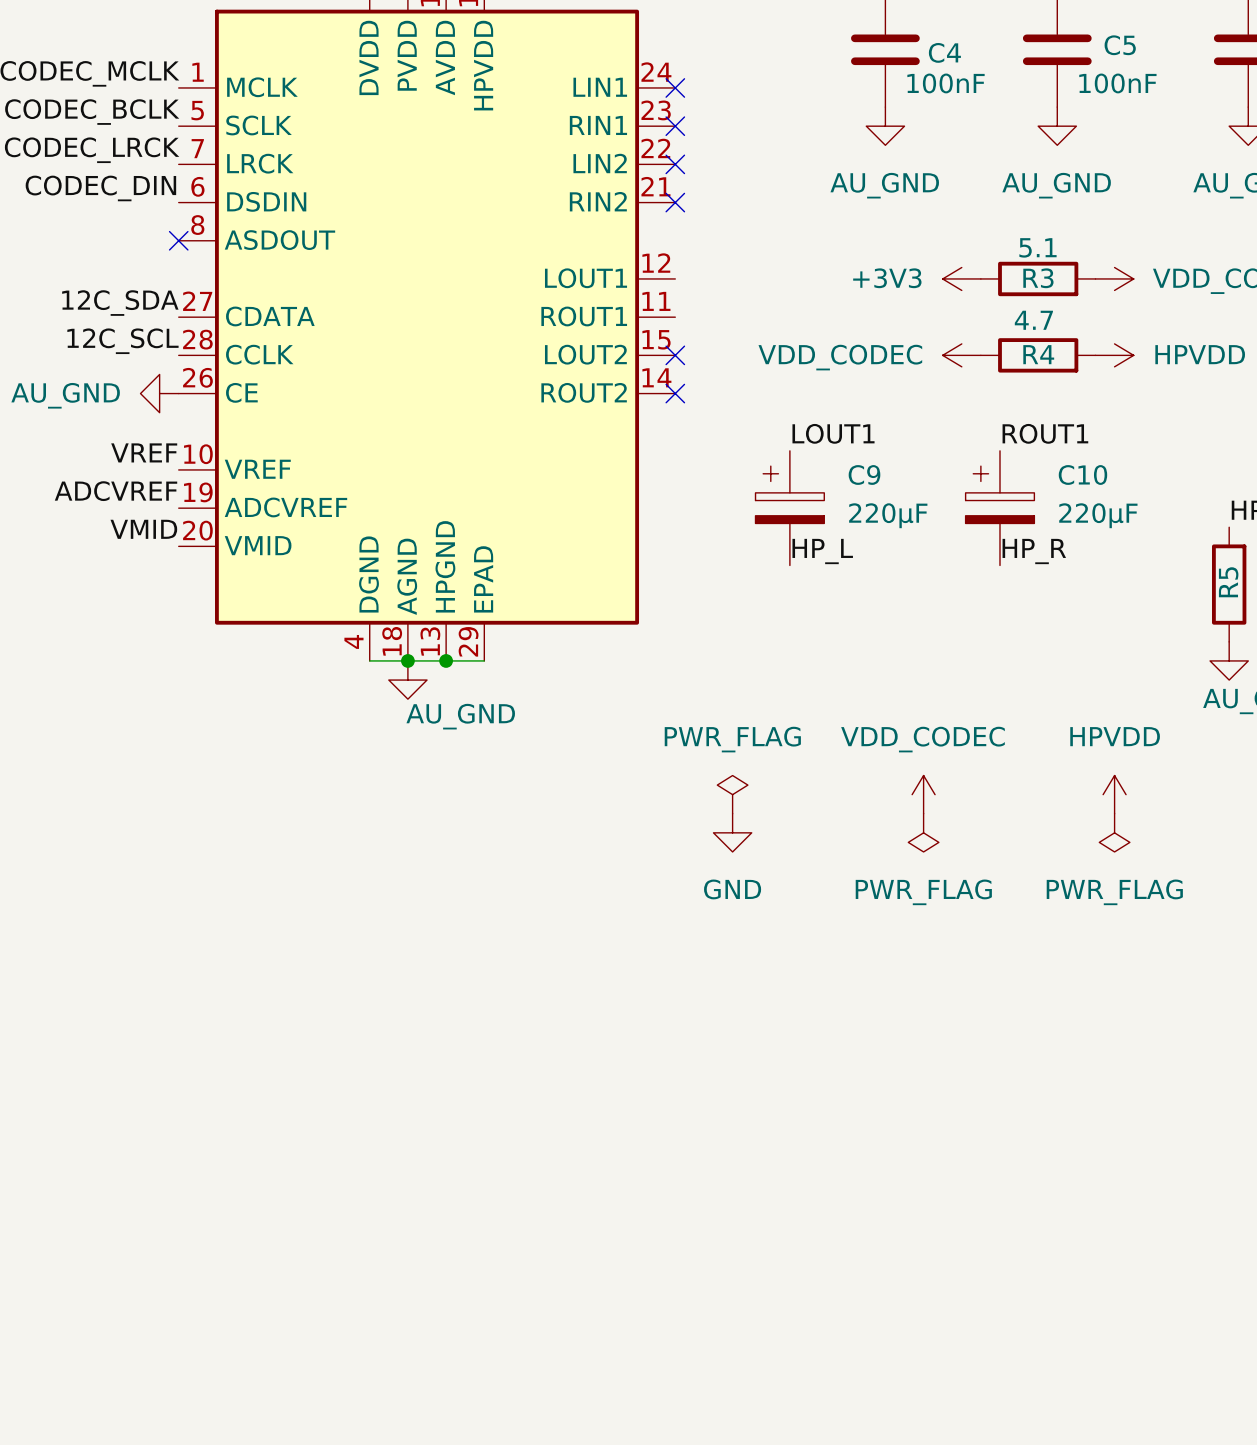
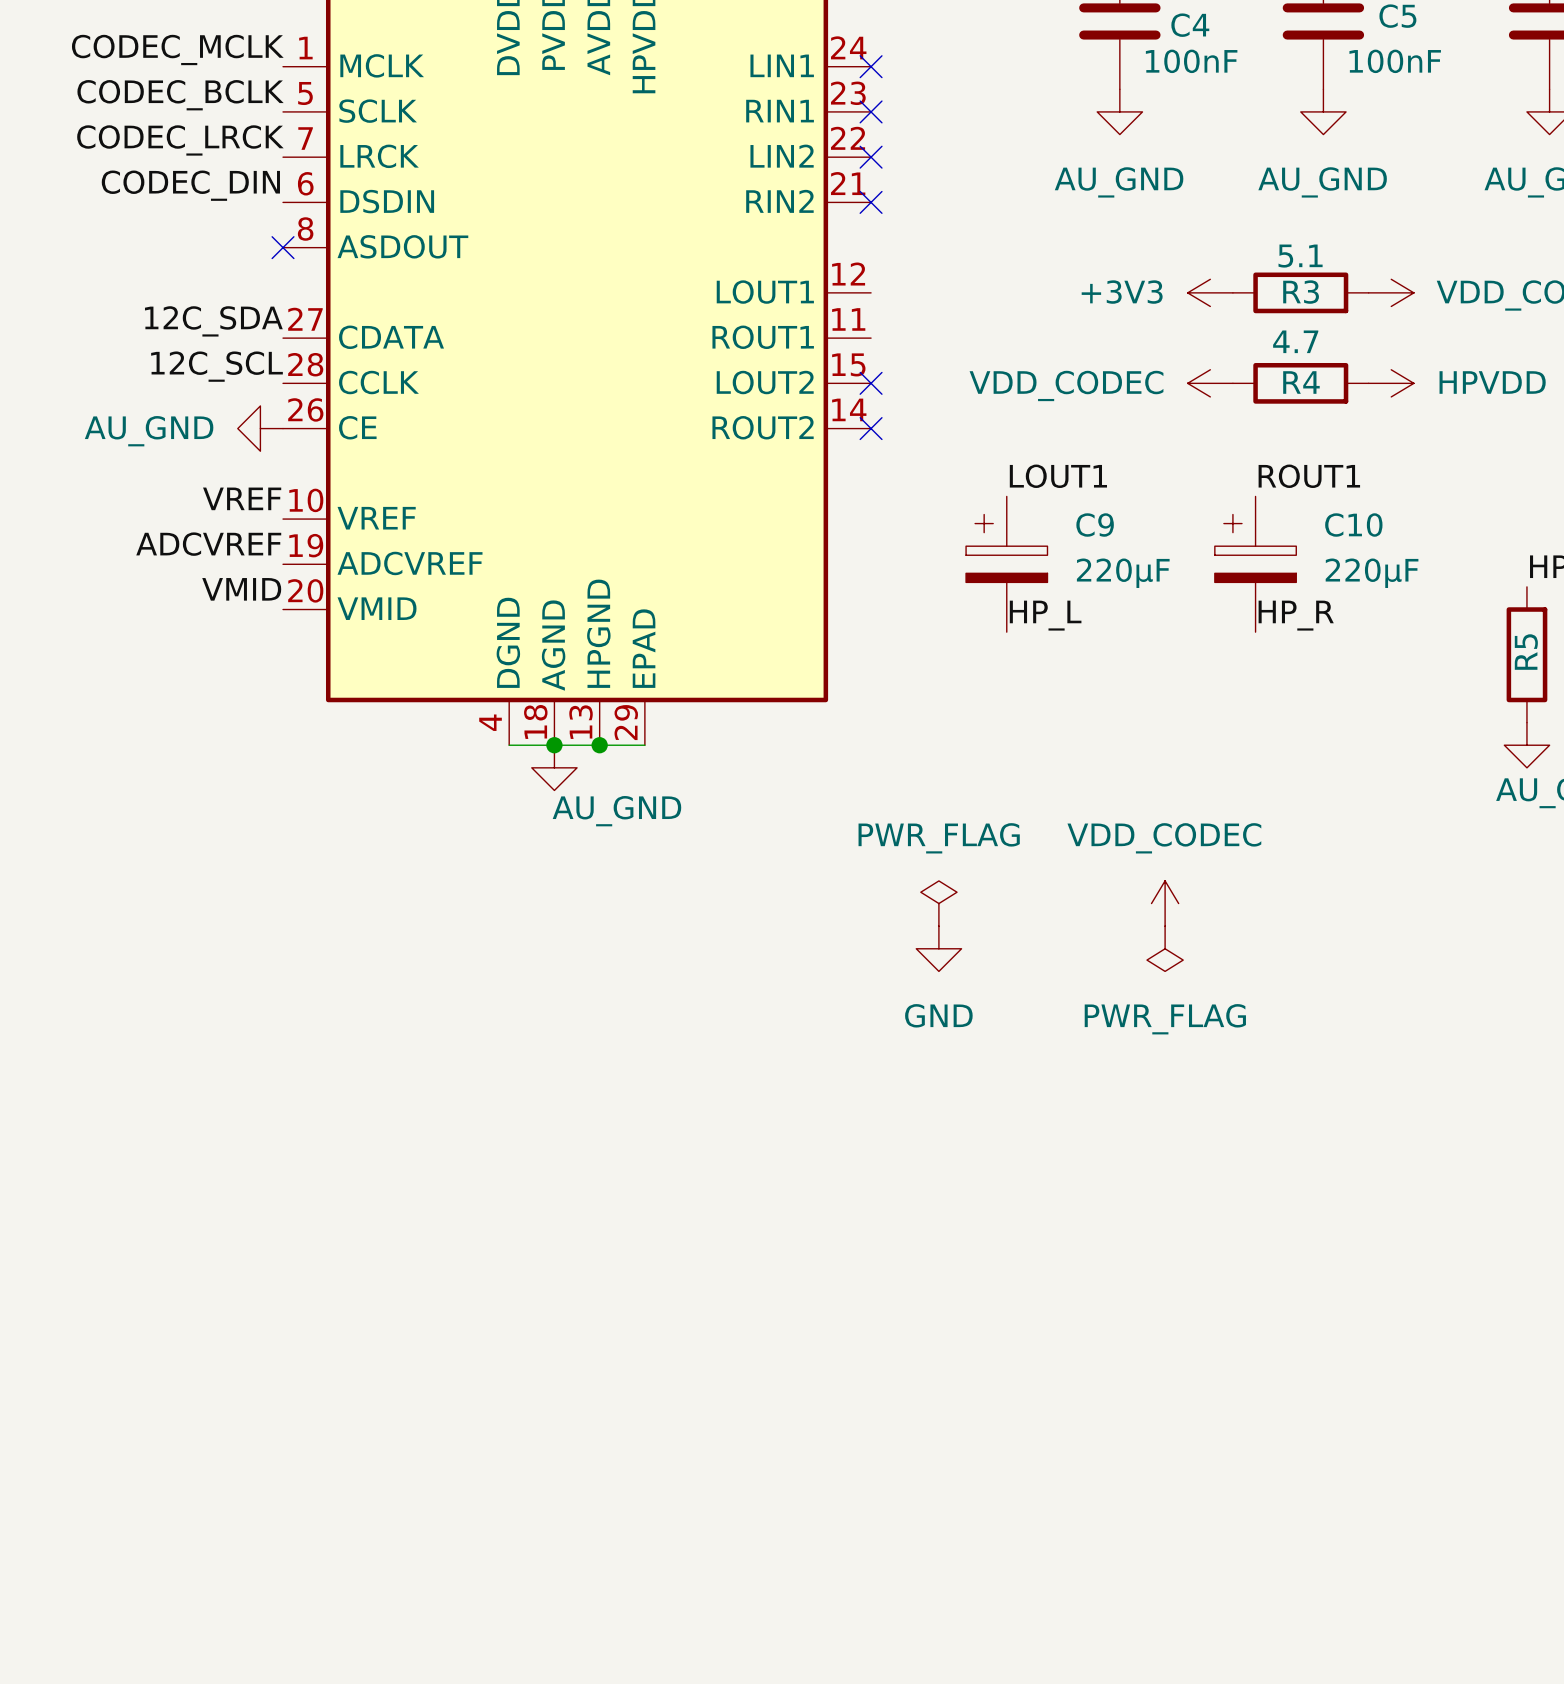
power symbol: HPVDD (1114, 794) -> none
power symbol: PWR_FLAG (1114, 832) -> none

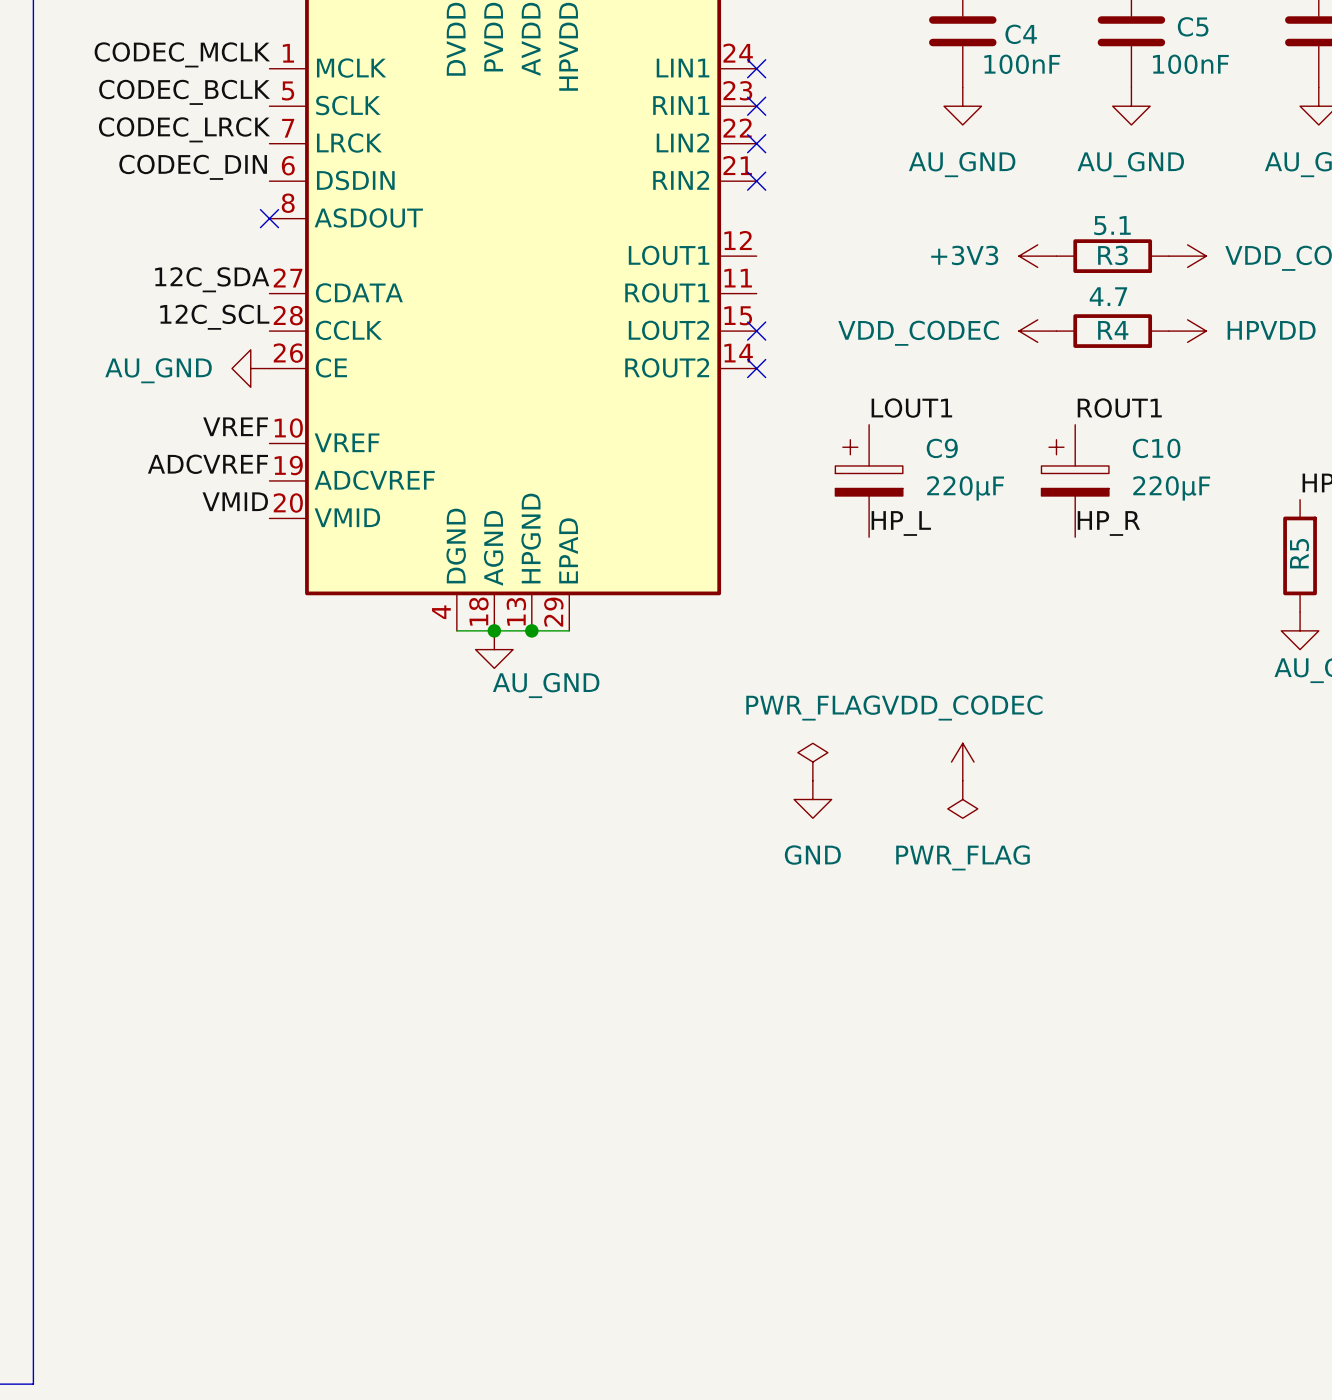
power symbol position: VDD_CODEC (1165, 903) -> VDD_CODEC (962, 762)
power symbol position: PWR_FLAG (1165, 948) -> PWR_FLAG (962, 799)

